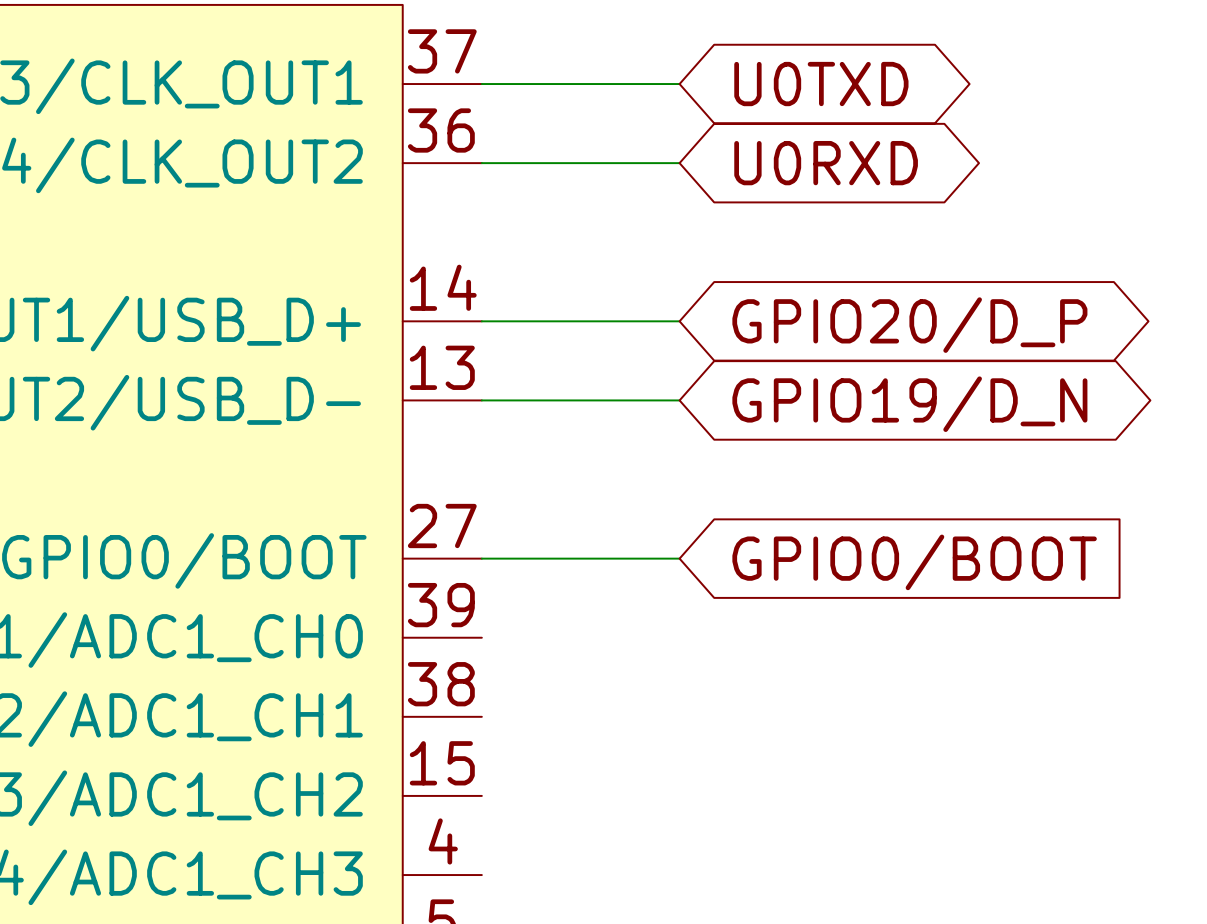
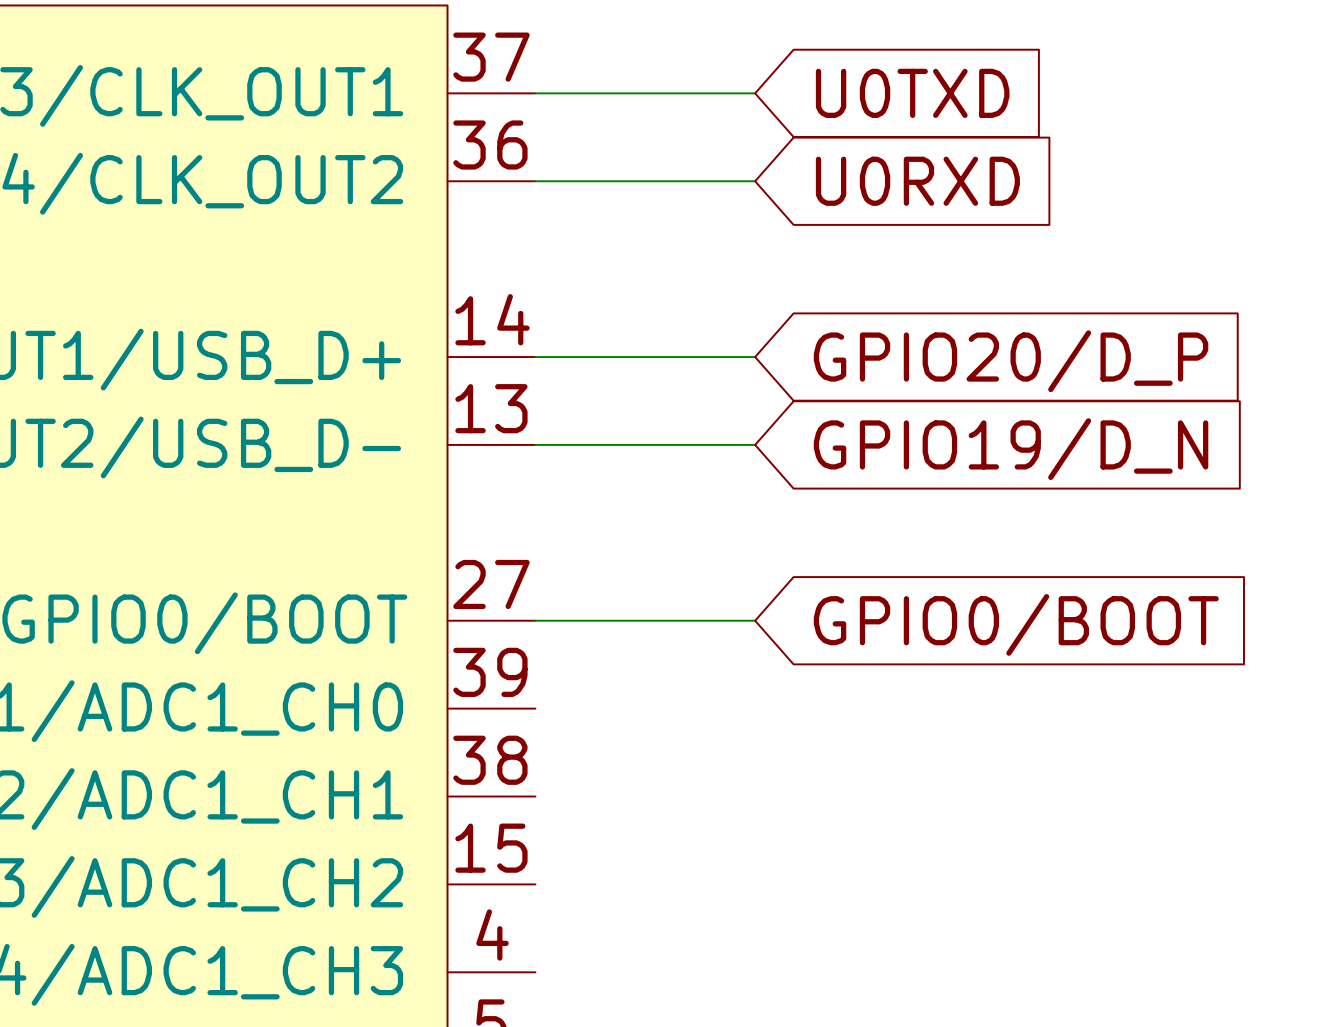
global label shape: bidirectional (821, 84) -> input (912, 93)
global label shape: bidirectional (826, 163) -> input (917, 181)
global label shape: bidirectional (909, 325) -> input (1011, 361)
global label shape: bidirectional (909, 404) -> input (1011, 449)

